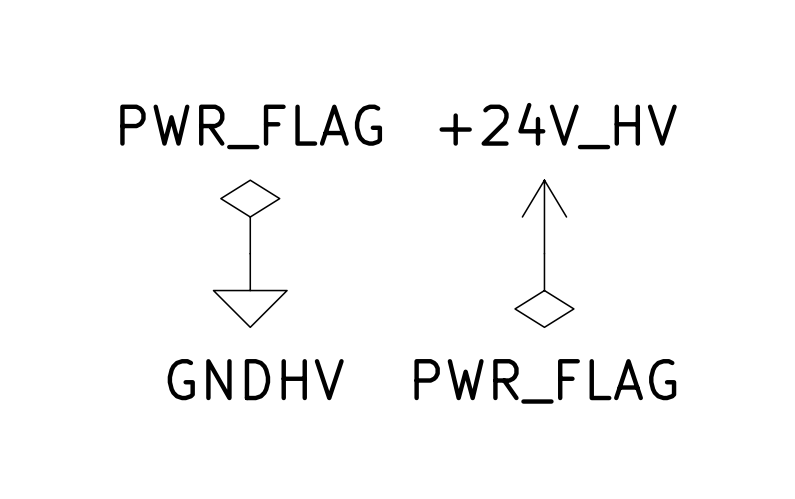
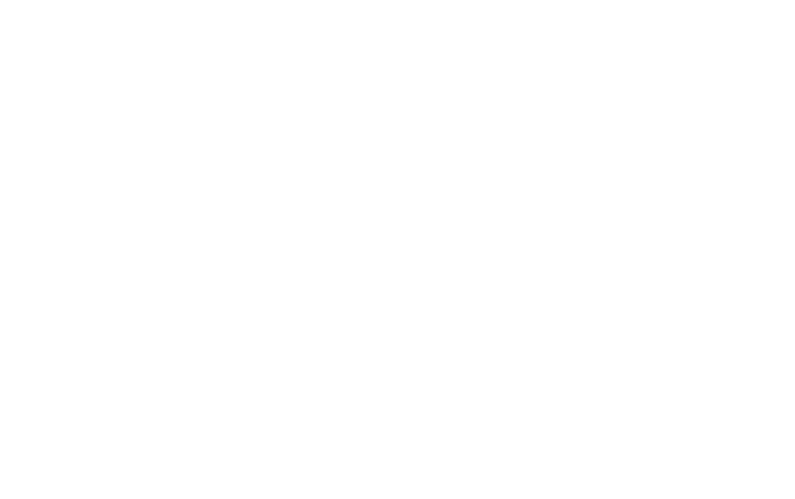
power symbol: PWR_FLAG (250, 217) -> none
power symbol: +24V_HV (544, 217) -> none
power symbol: GNDHV (250, 290) -> none
power symbol: PWR_FLAG (544, 290) -> none

